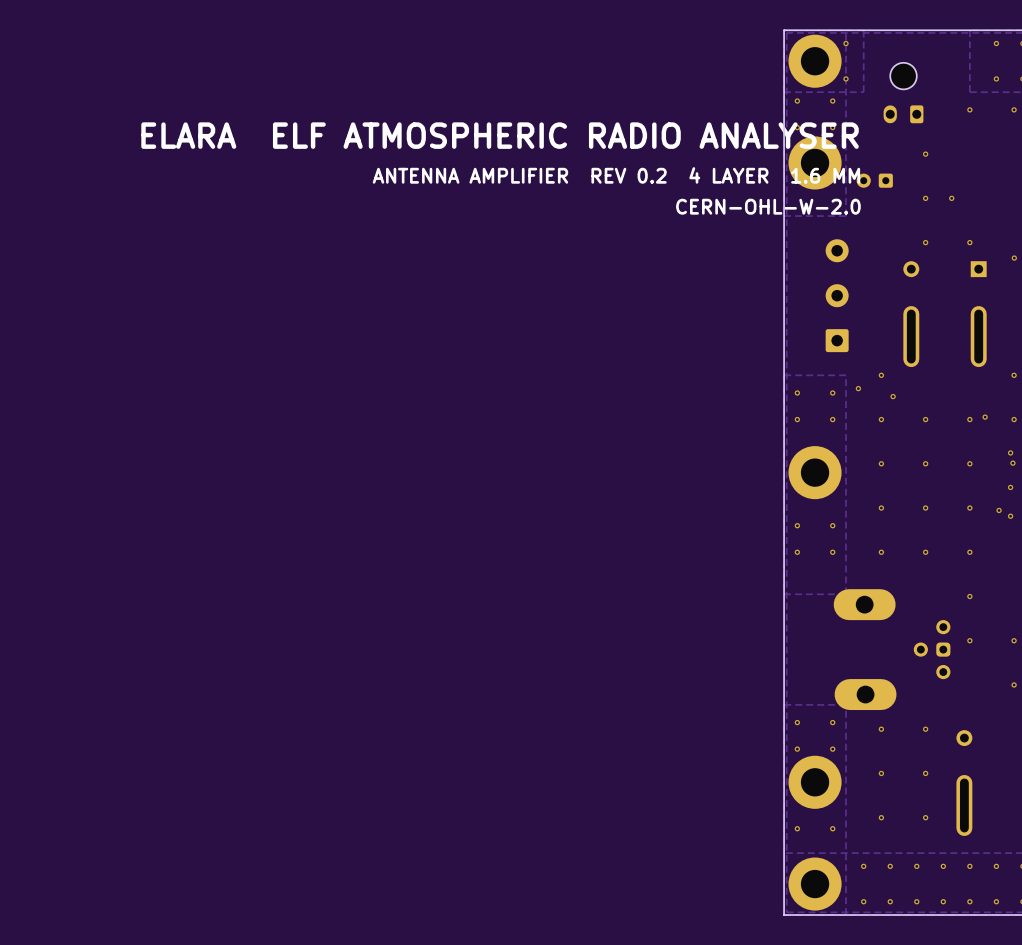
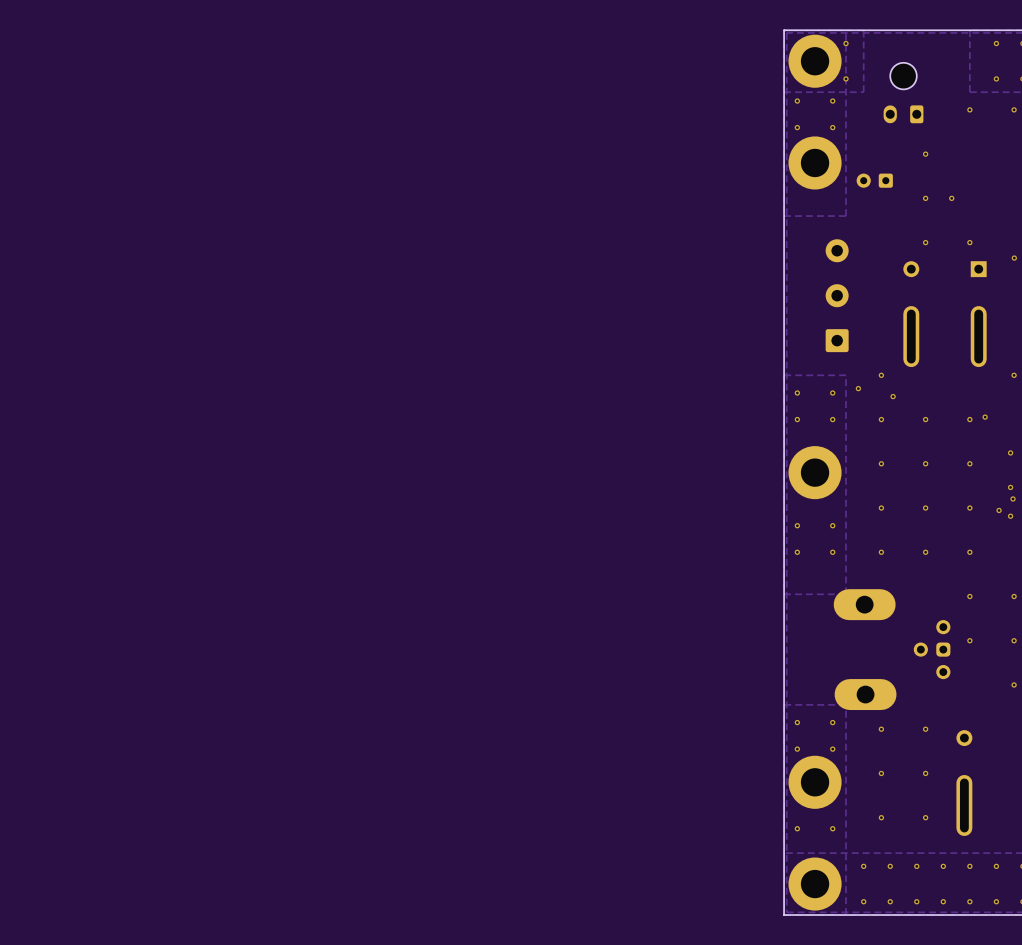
text: ELARA ELF ATMOSPHERIC RADIO ANALYSER (500, 135) -> none
text: ANTENNA AMPLIFIER REV 0.2 4 LAYER 1.6 MM (616, 175) -> none
text: CERN-OHL-W-2.0 (768, 206) -> none
via: (1014, 419) -> none
via position: (1012, 463) -> (1013, 498)
via: none -> (1014, 596)

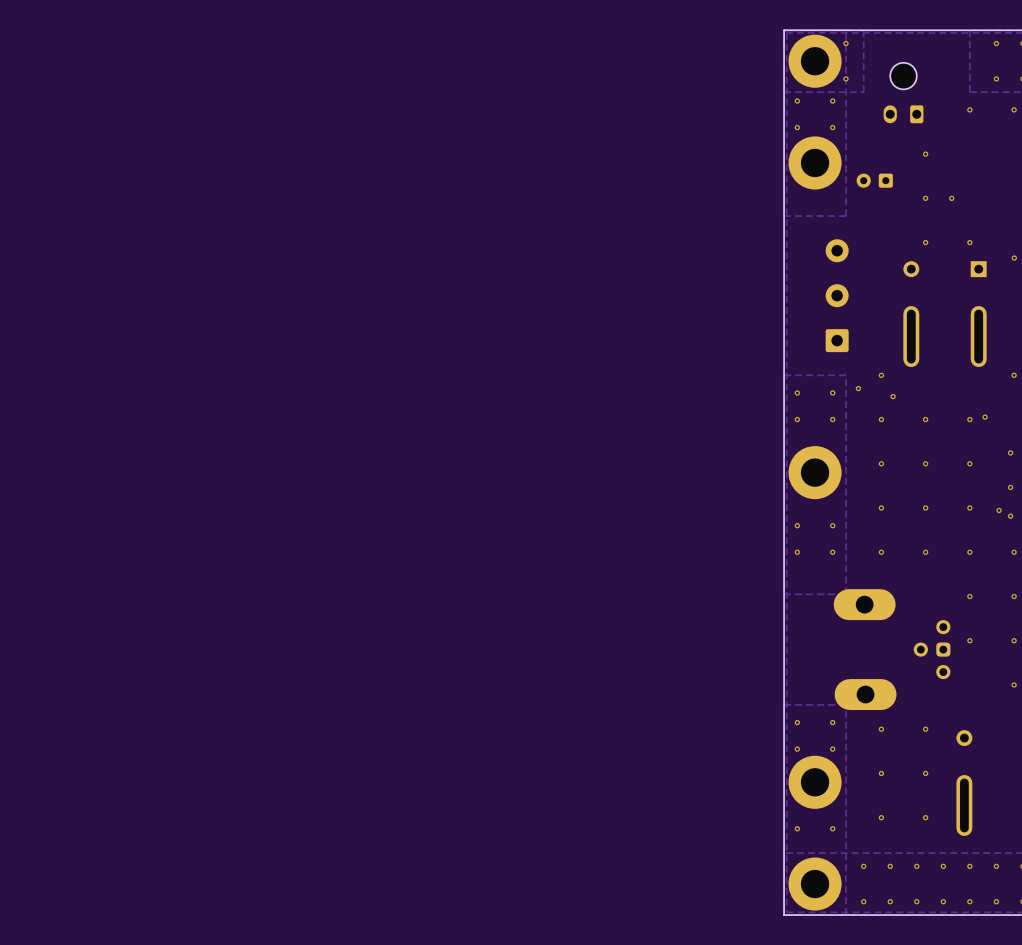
via: (1013, 498) -> none
via: none -> (1014, 552)

